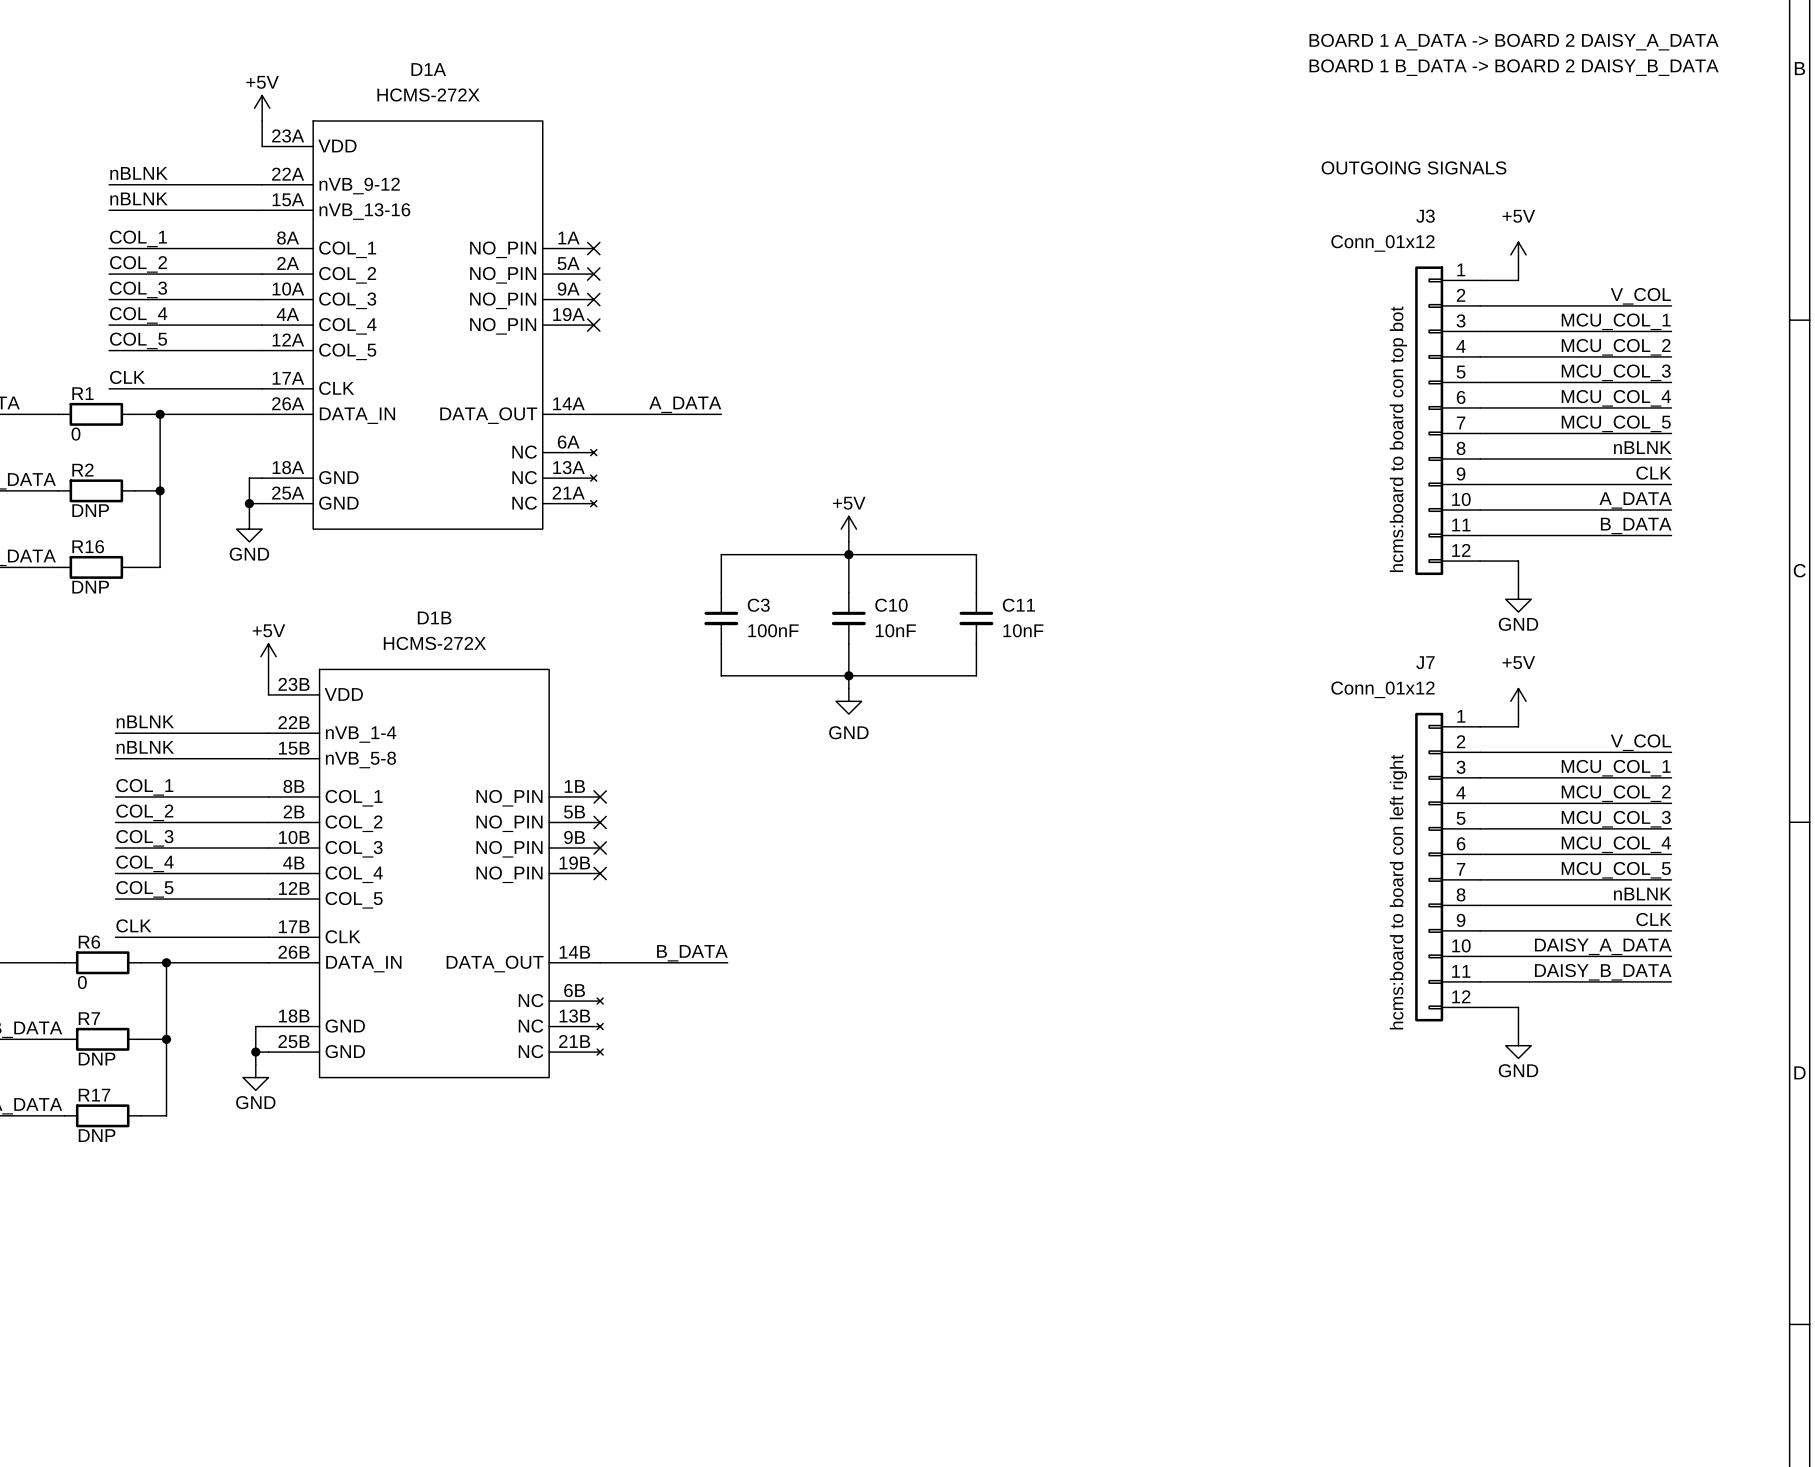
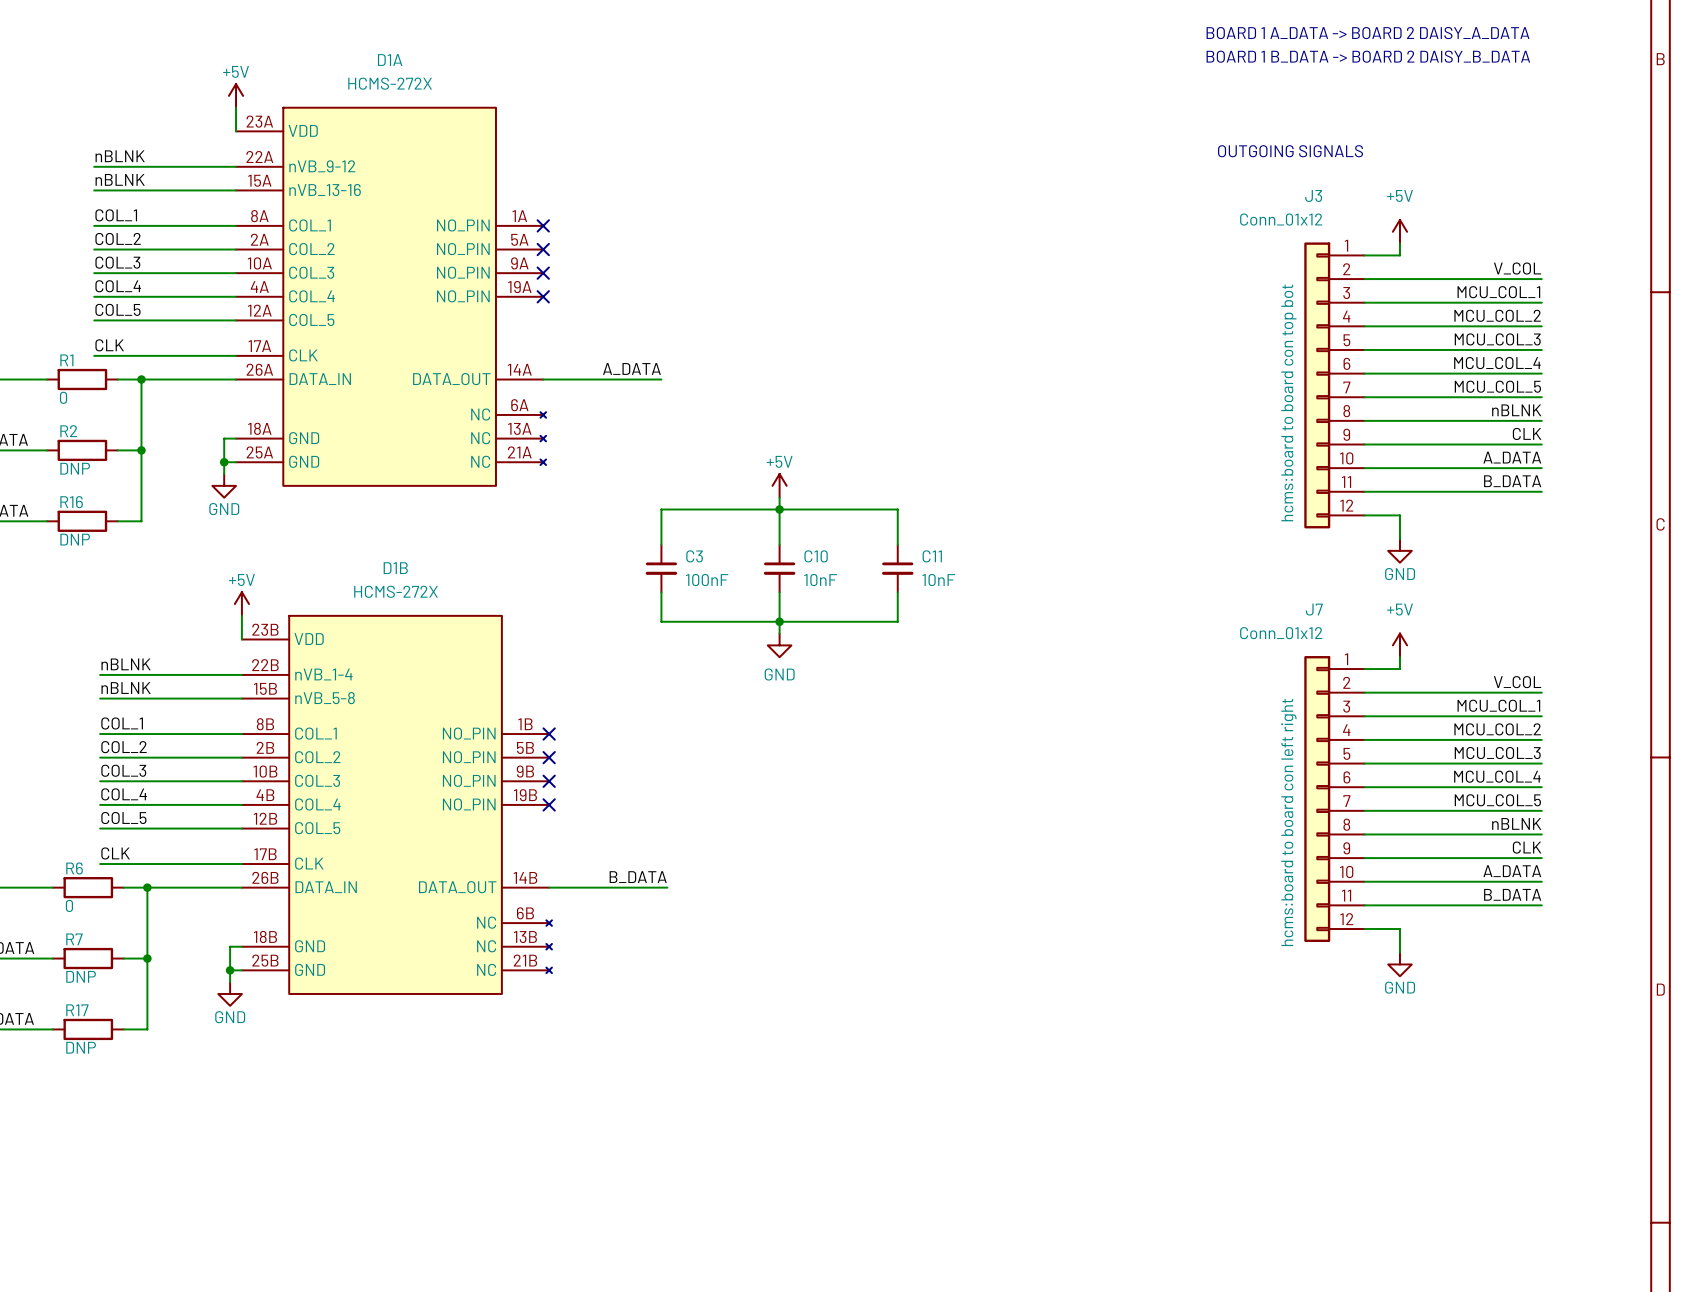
label: DAISY_A_DATA (1603, 946) -> A_DATA (1512, 871)
label: DAISY_B_DATA (1603, 972) -> B_DATA (1512, 894)

